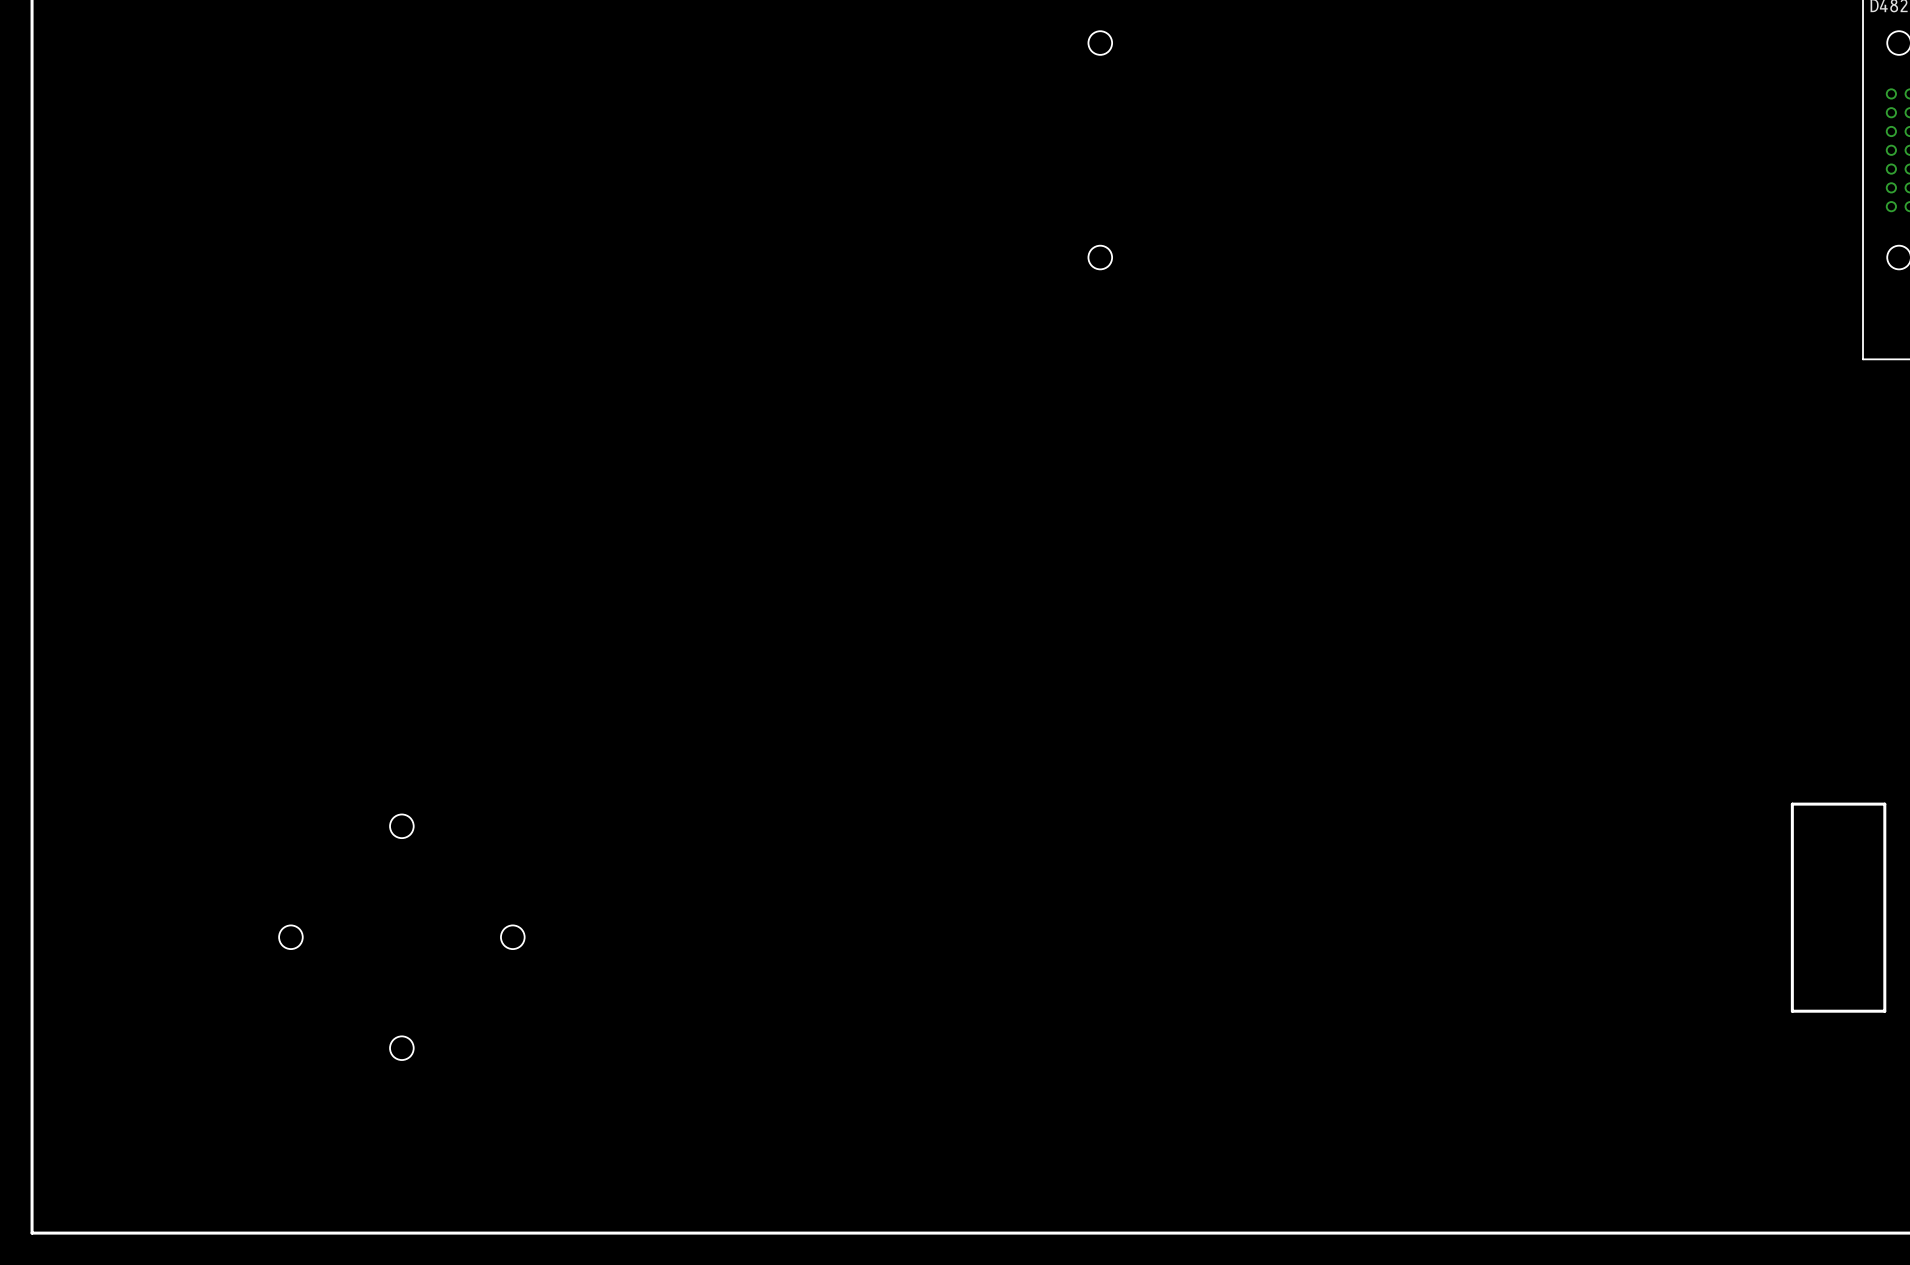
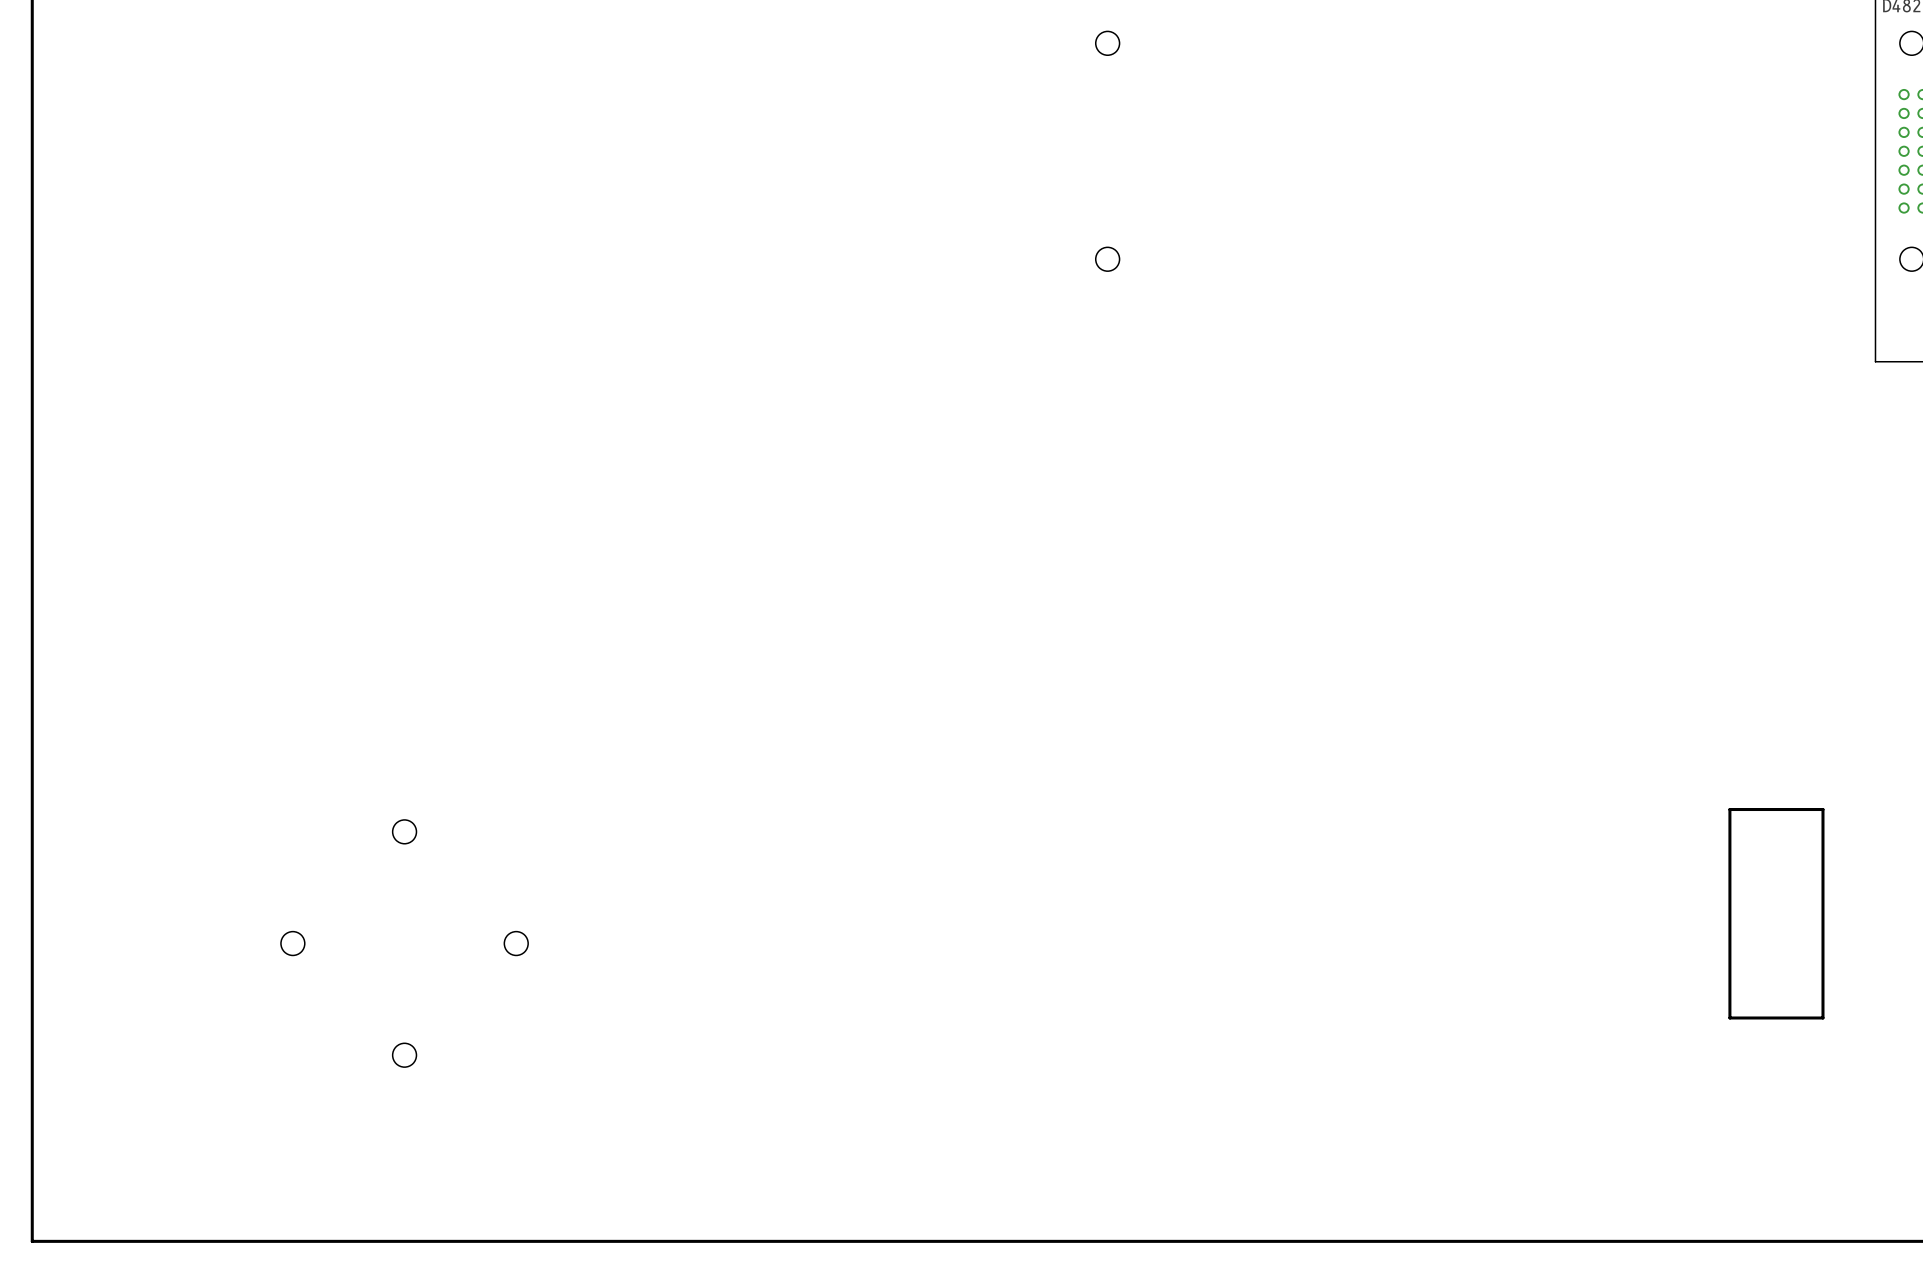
board edge: (1792, 804) (1792, 1011) -> (1804, 809) (1729, 809) (1729, 1017) (1804, 1017)
board edge: (1810, 804) (1884, 804) (1884, 1011) (1810, 1011) -> (1822, 809) (1822, 1017)

